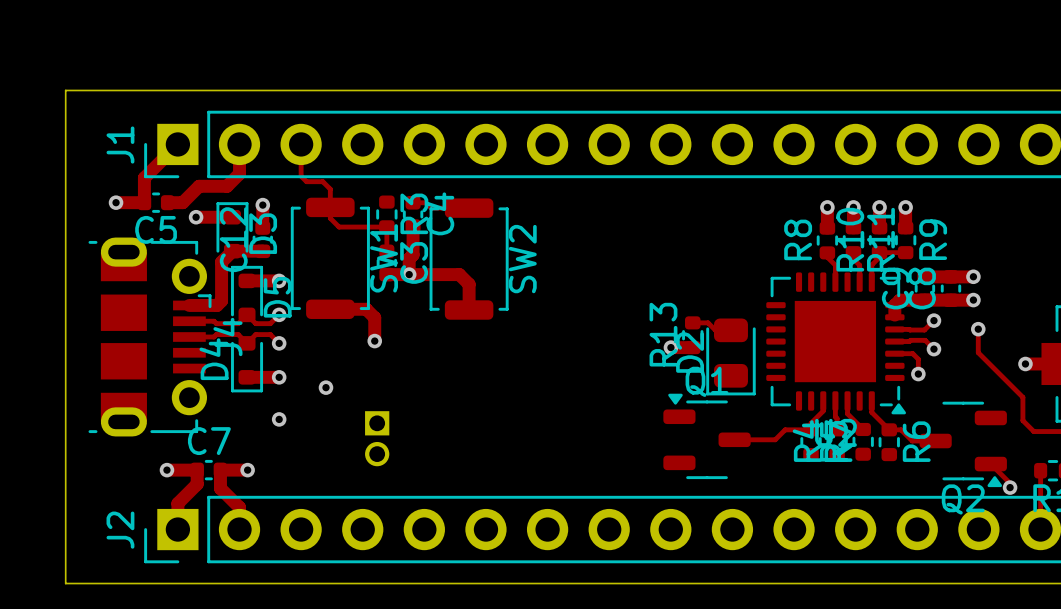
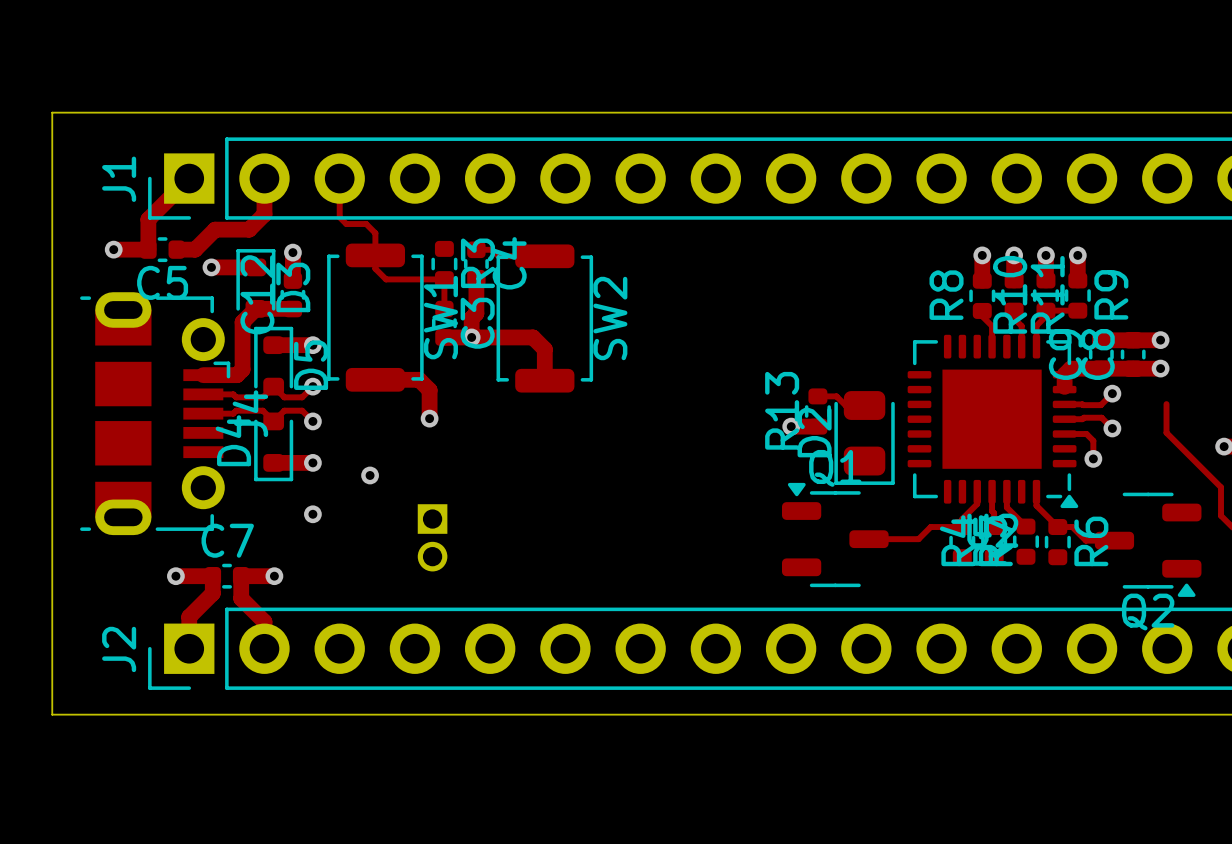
via: (978, 329) -> none
track: (990, 464) (1010, 483) (1010, 487) -> none
via: (1010, 487) -> none

